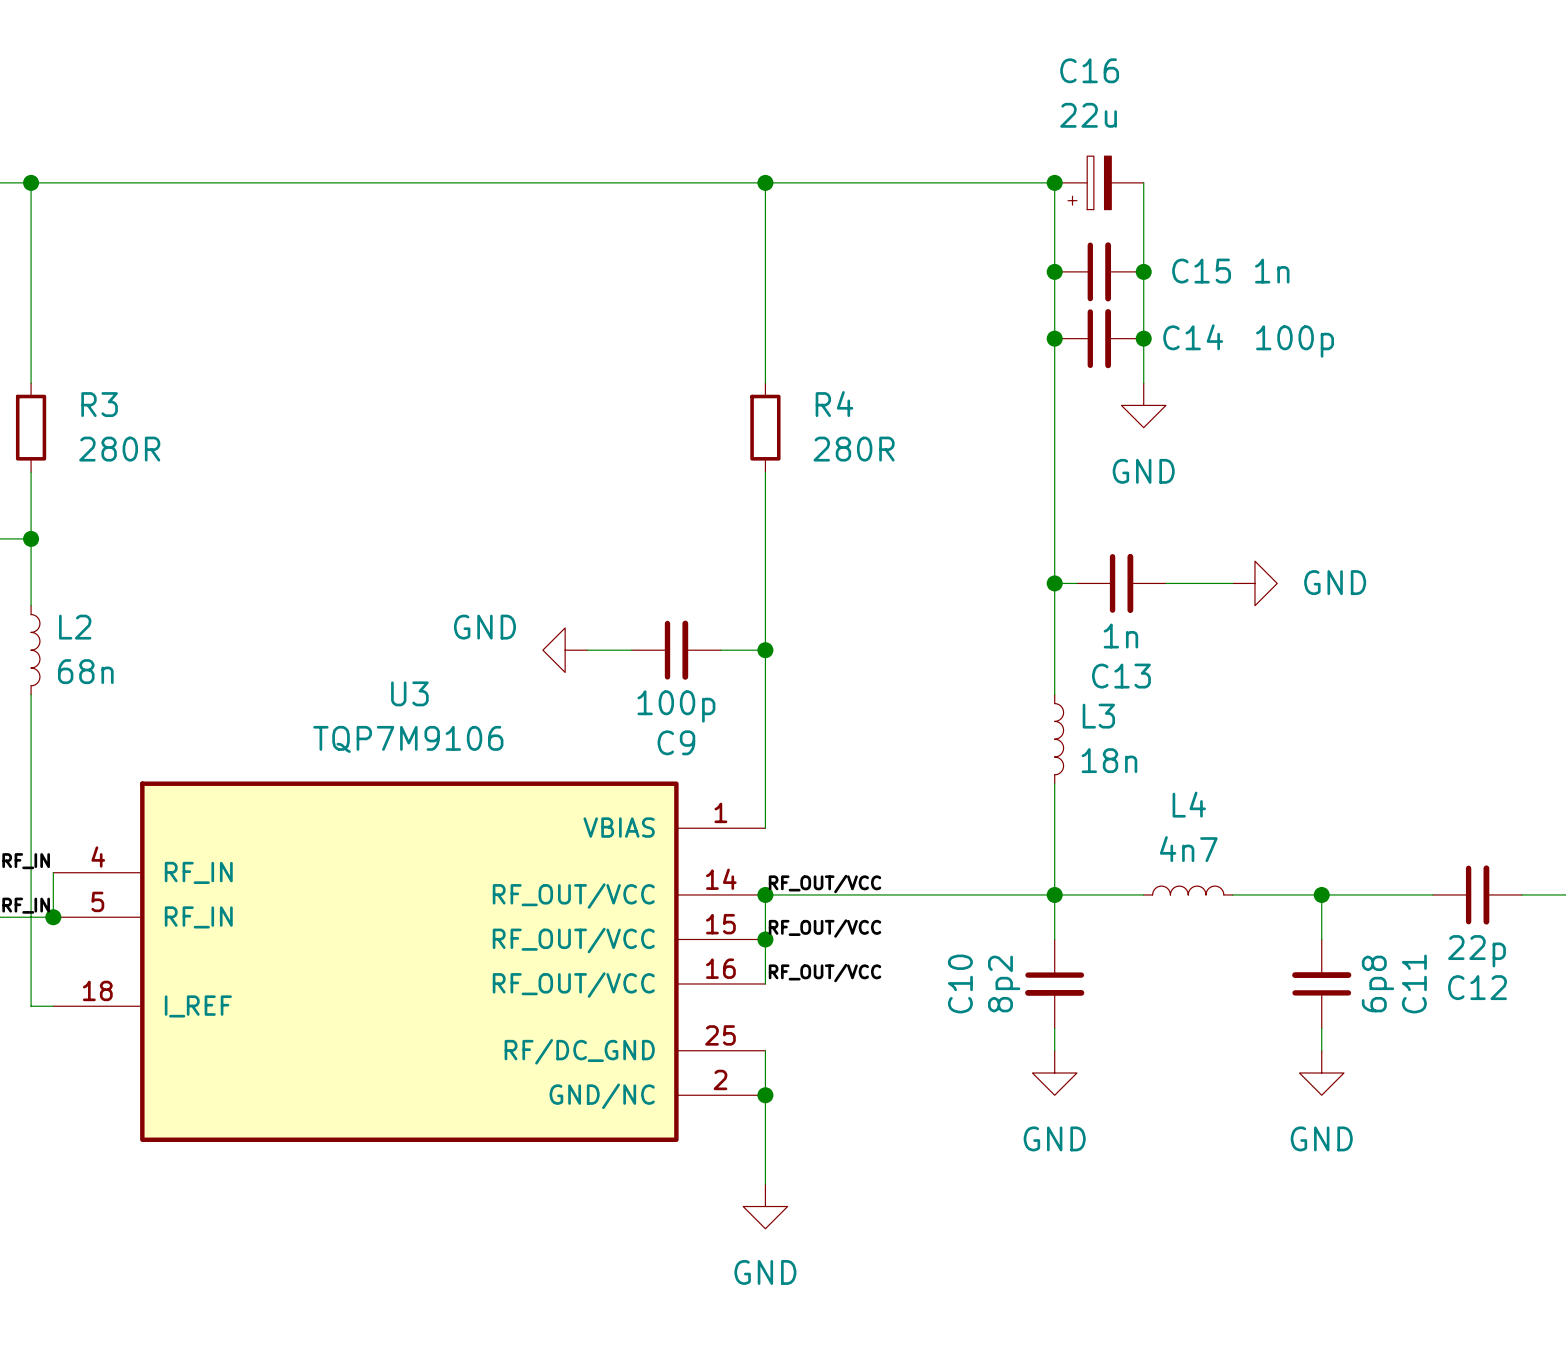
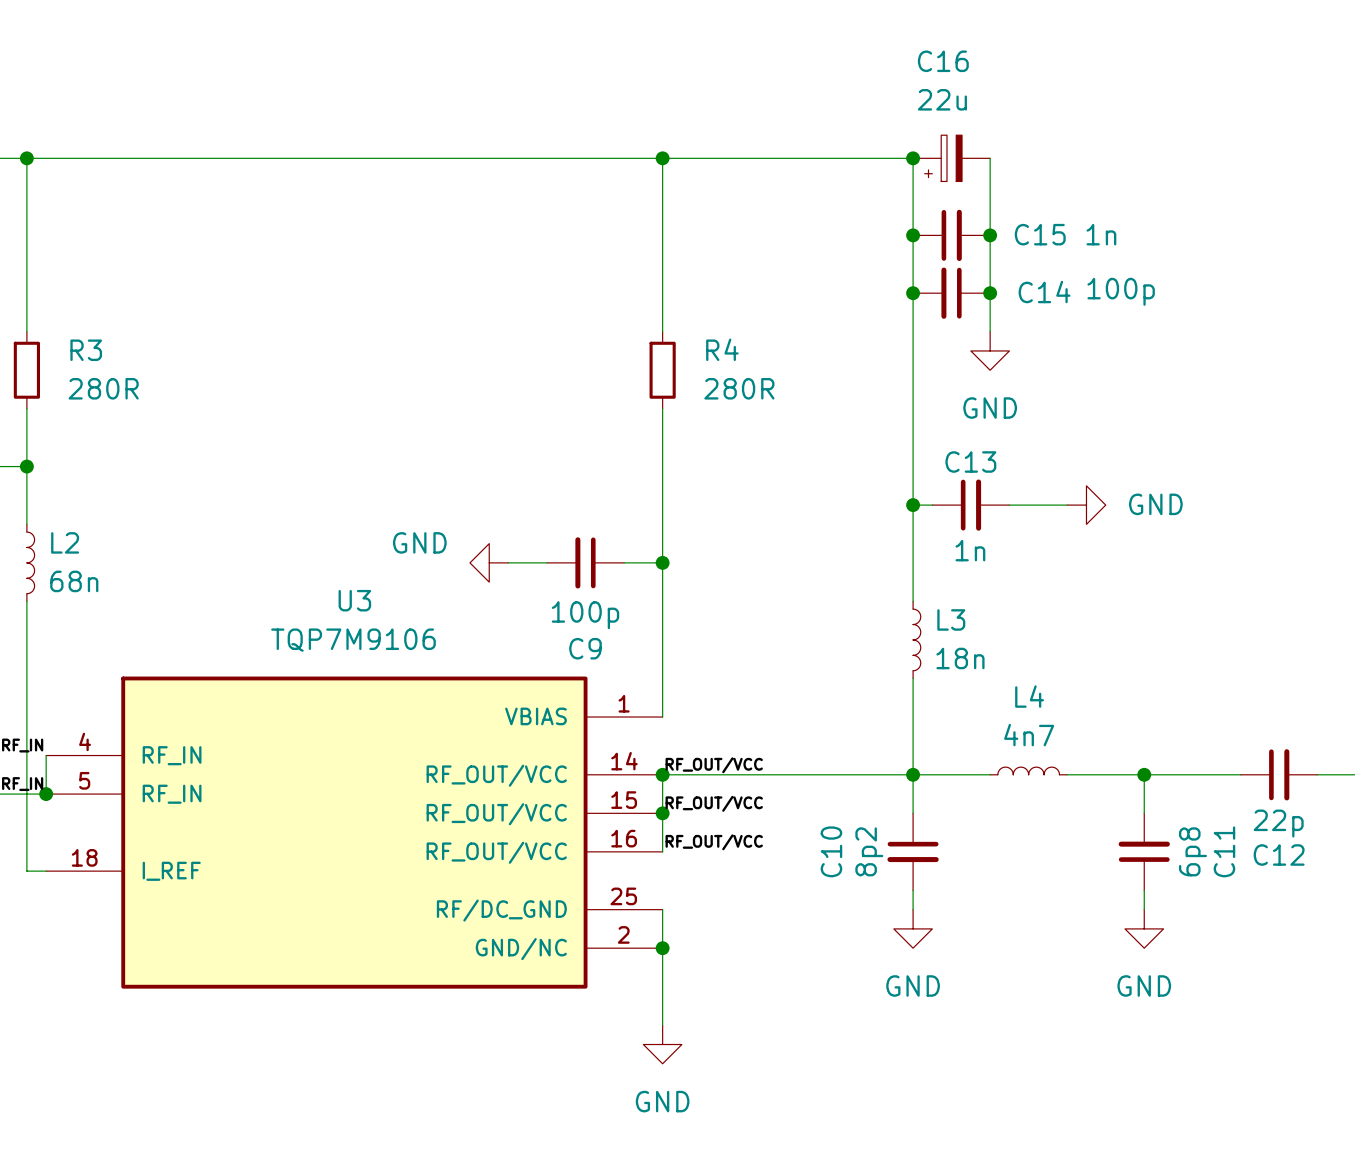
C14 rotation: 0° (1099, 338) -> 180° (951, 293)
C9 rotation: 0° (676, 650) -> 180° (585, 562)
C13 name position: C13 (1121, 676) -> C13 (970, 461)

